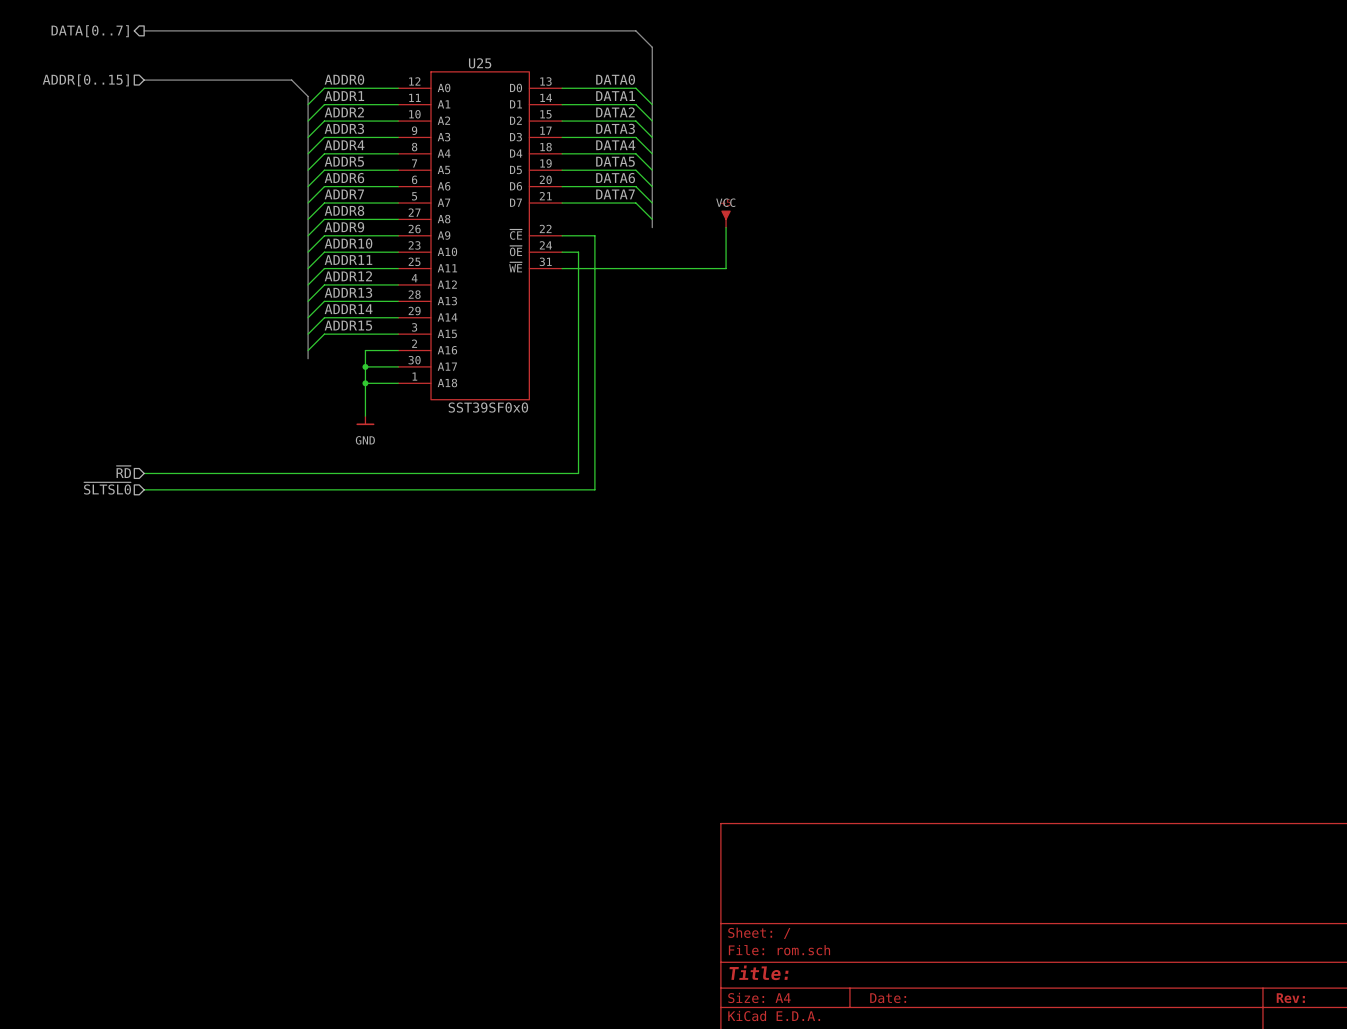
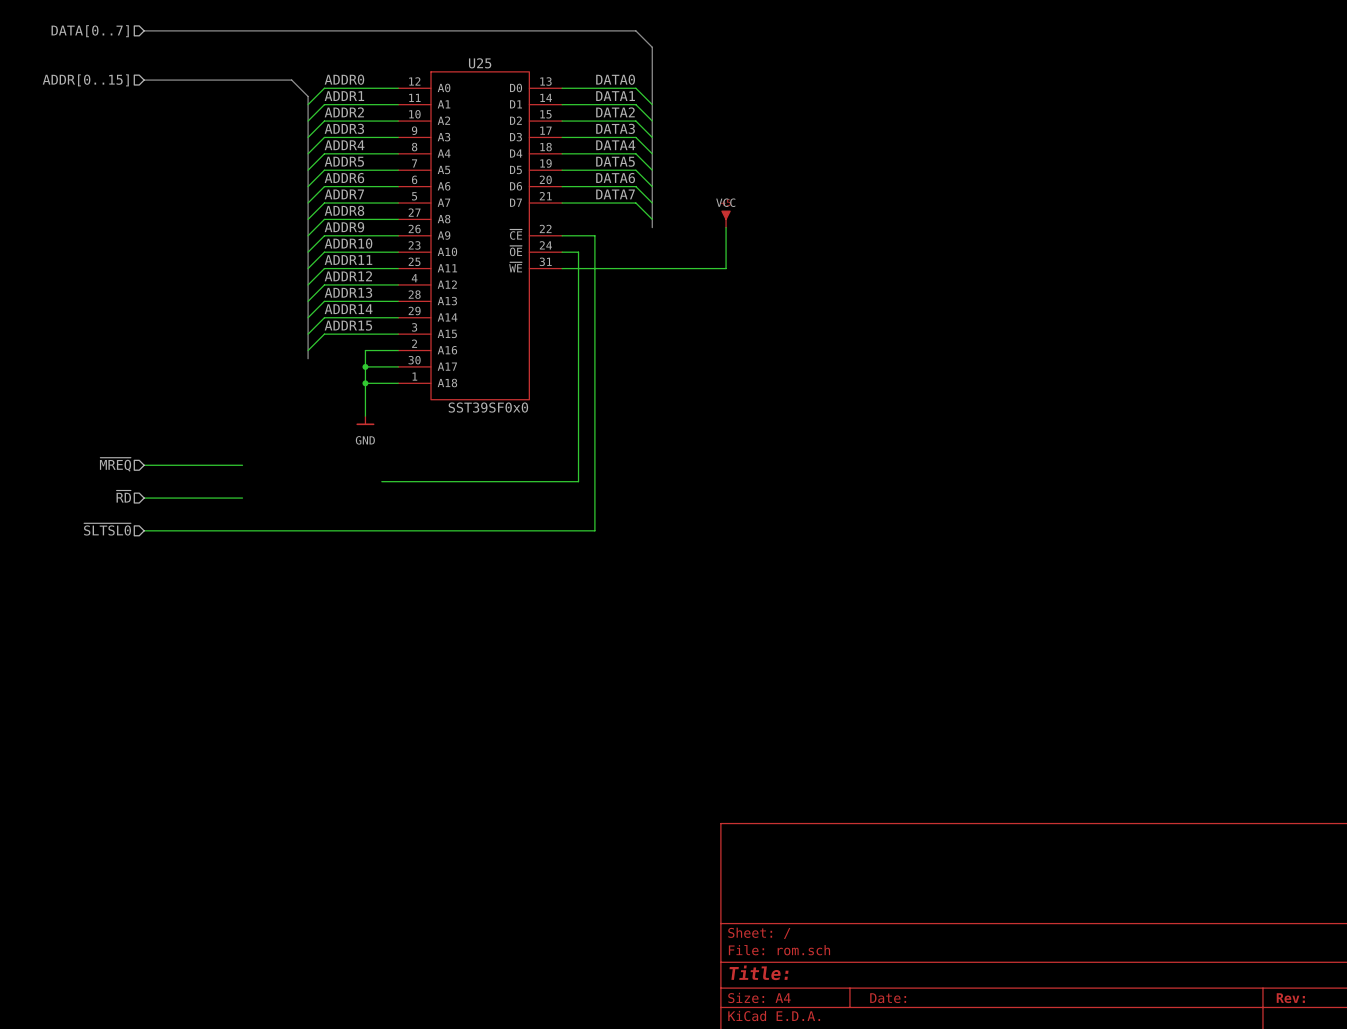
hierarchical label shape: output (90, 31) -> input (90, 31)
hierarchical label: none -> ~{MREQ} (115, 464)
wire: none -> (144, 465) (242, 465)
hierarchical label position: ~{RD} (123, 471) -> ~{RD} (123, 496)
wire: (144, 473) (578, 473) -> (381, 481) (578, 481) (578, 473)
hierarchical label position: ~{SLTSL0} (107, 488) -> ~{SLTSL0} (107, 529)
wire: (144, 489) (594, 489) -> (144, 530) (594, 530) (594, 489)
wire: none -> (144, 498) (242, 498)

